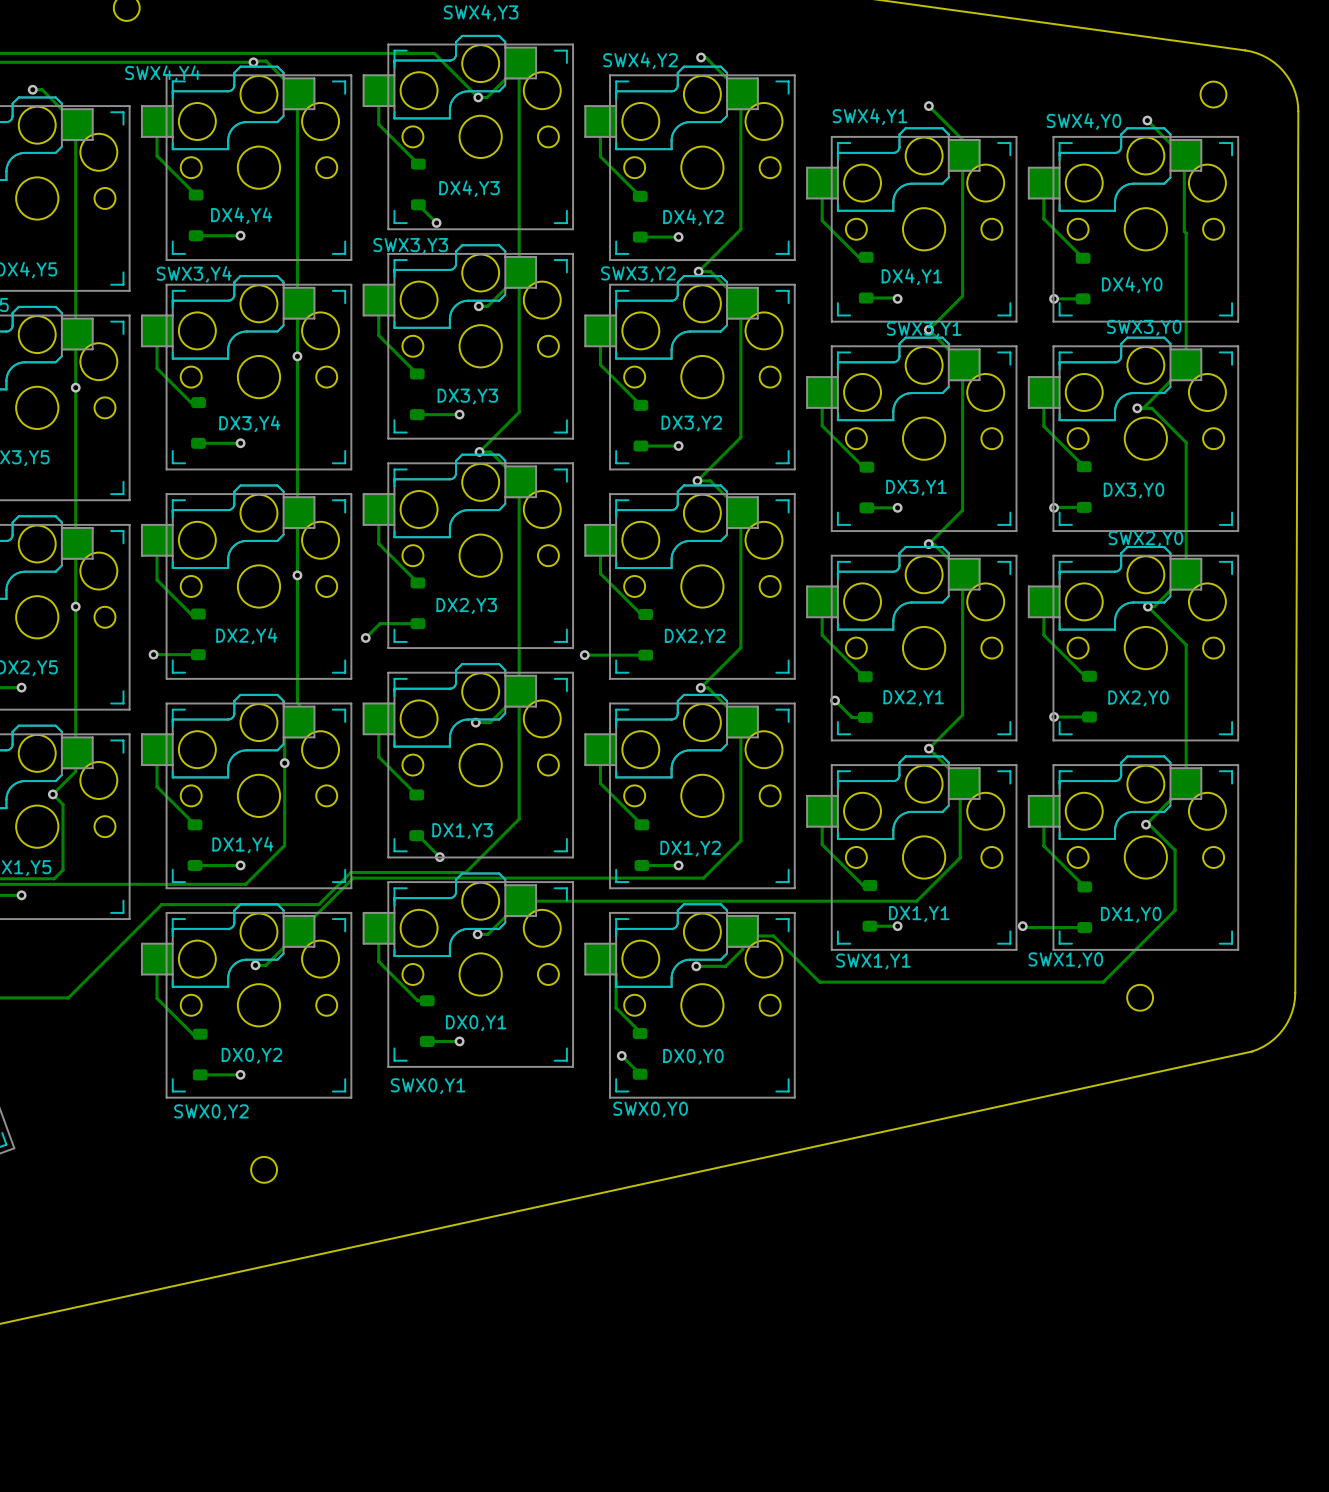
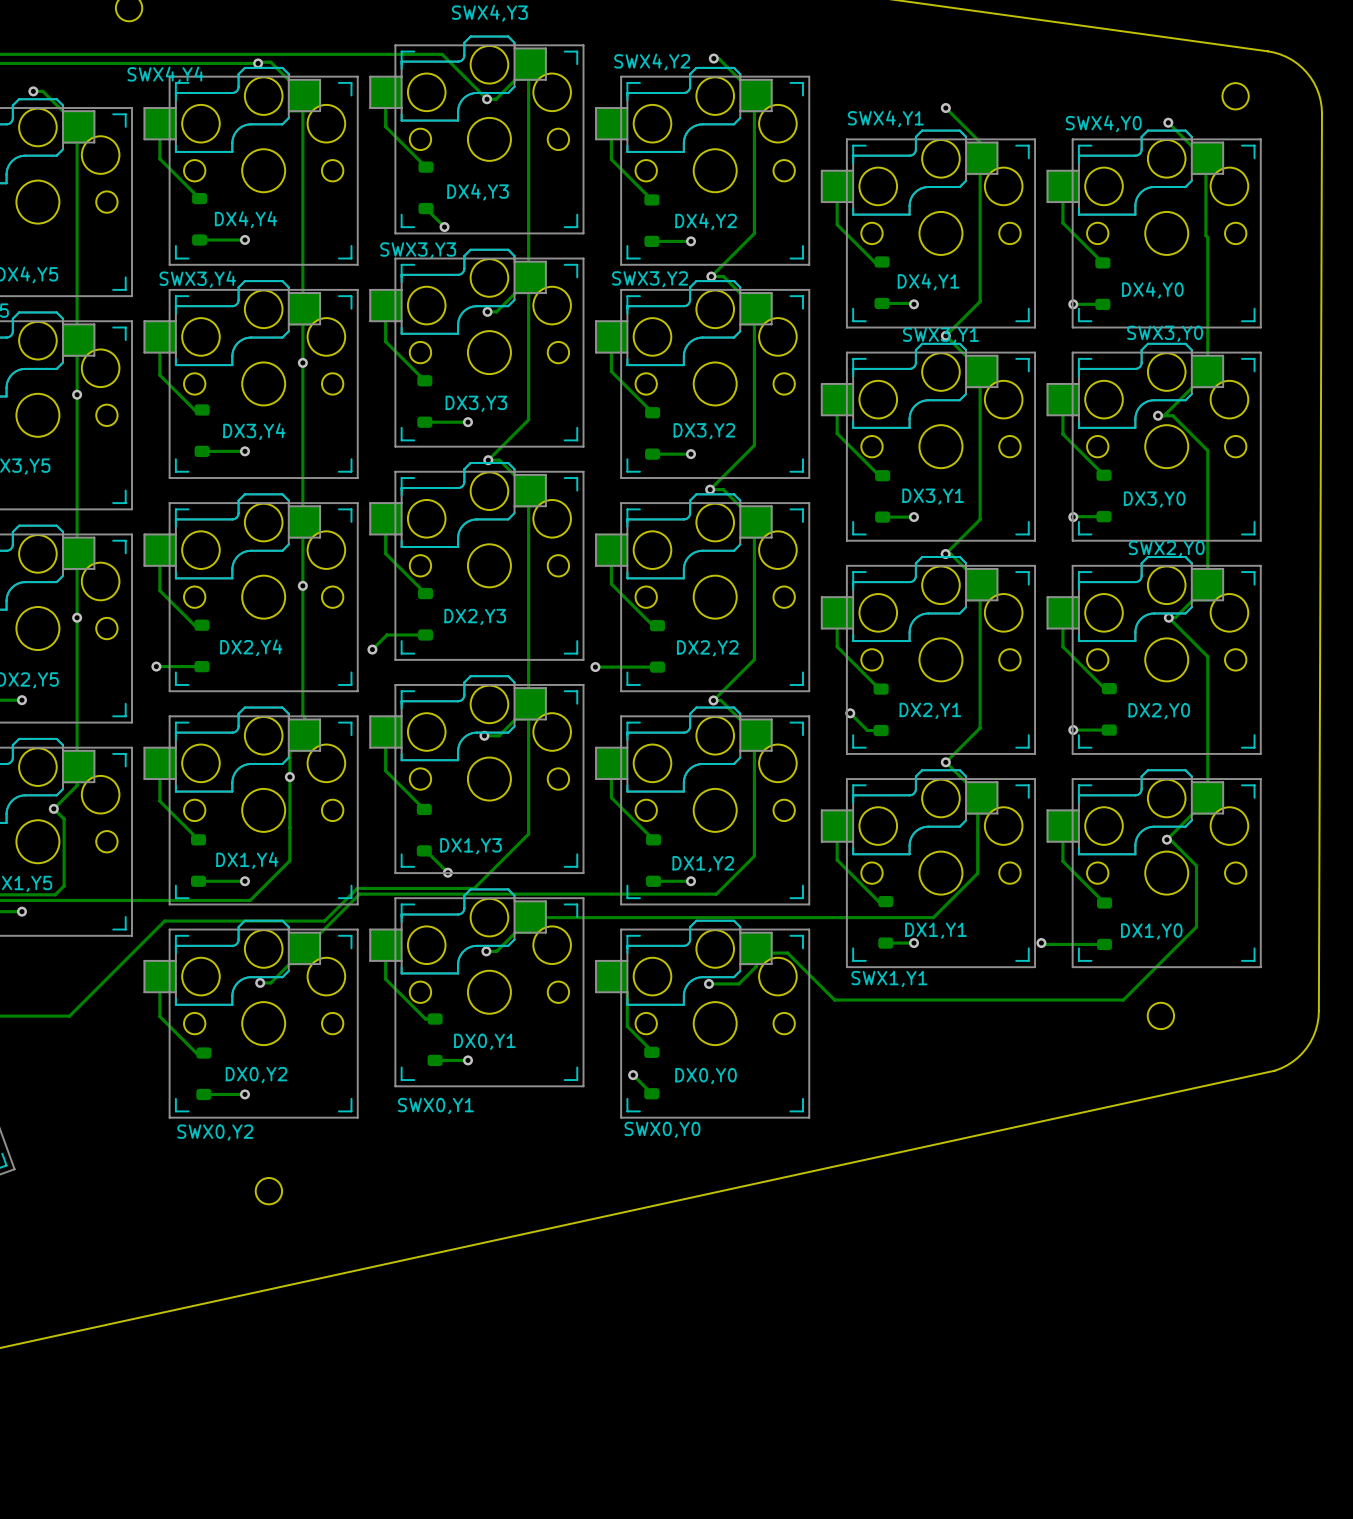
SWX1,Y0 name: SWX1,Y0 (1065, 960) -> none

